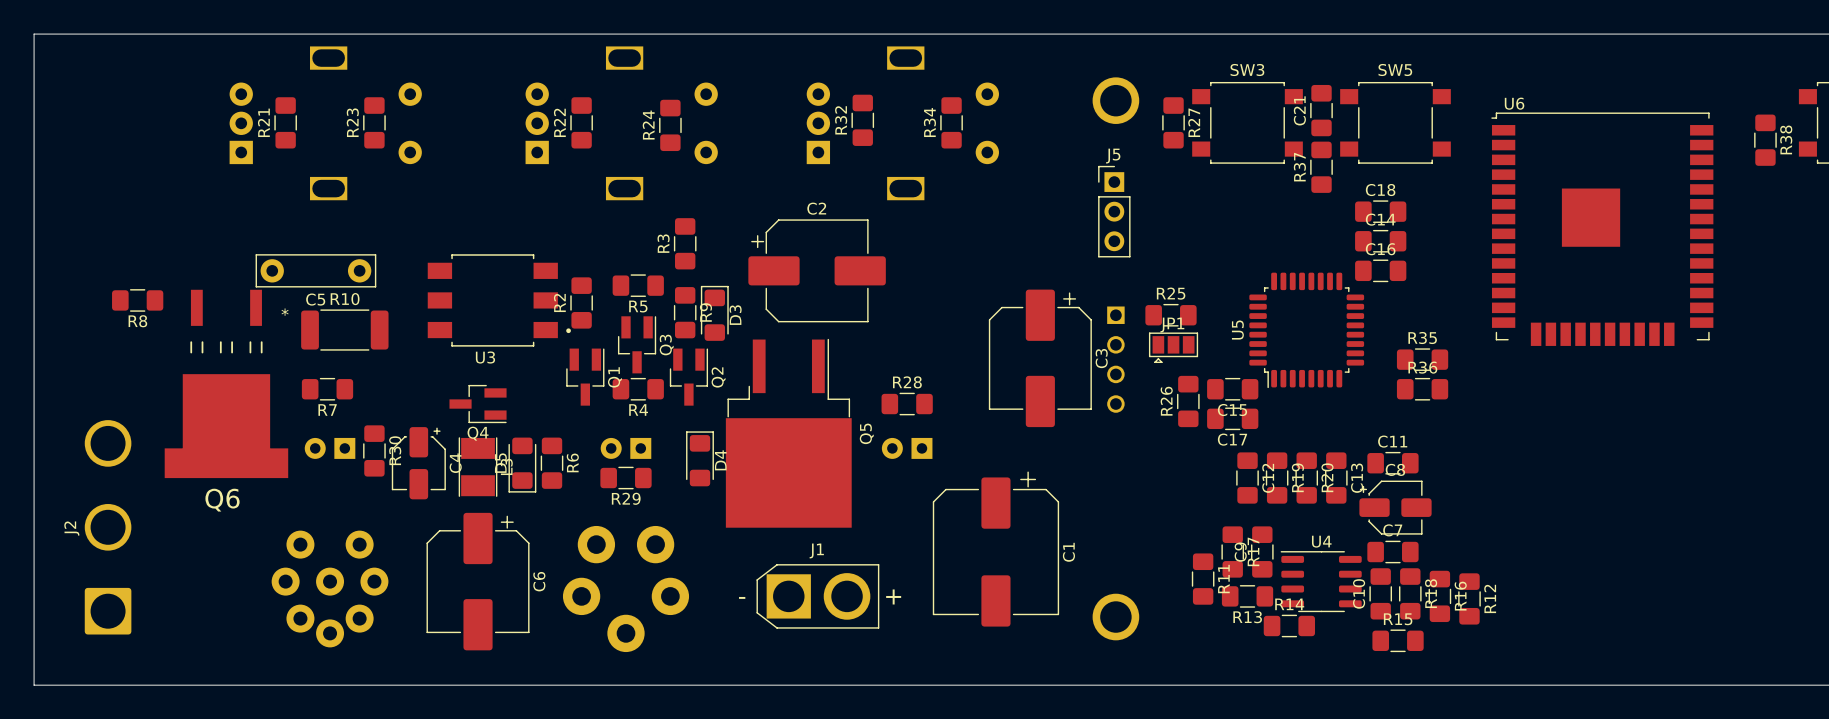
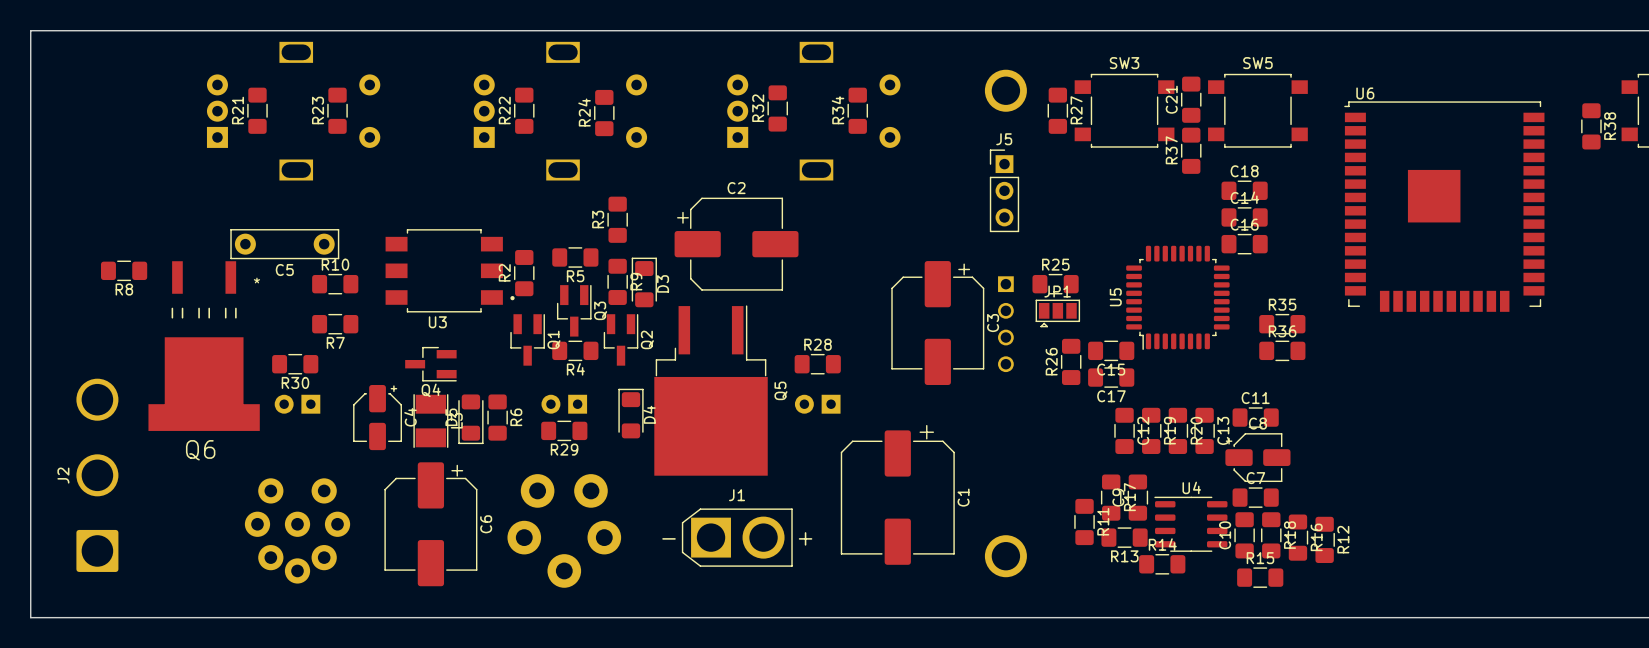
R10 footprint: [301, 309, 389, 351] -> [312, 273, 359, 295]
R7 position: (327, 389) -> (335, 324)
R30 rotation: 0° (374, 450) -> 90° clockwise (295, 364)
R30 position: (374, 450) -> (295, 364)

